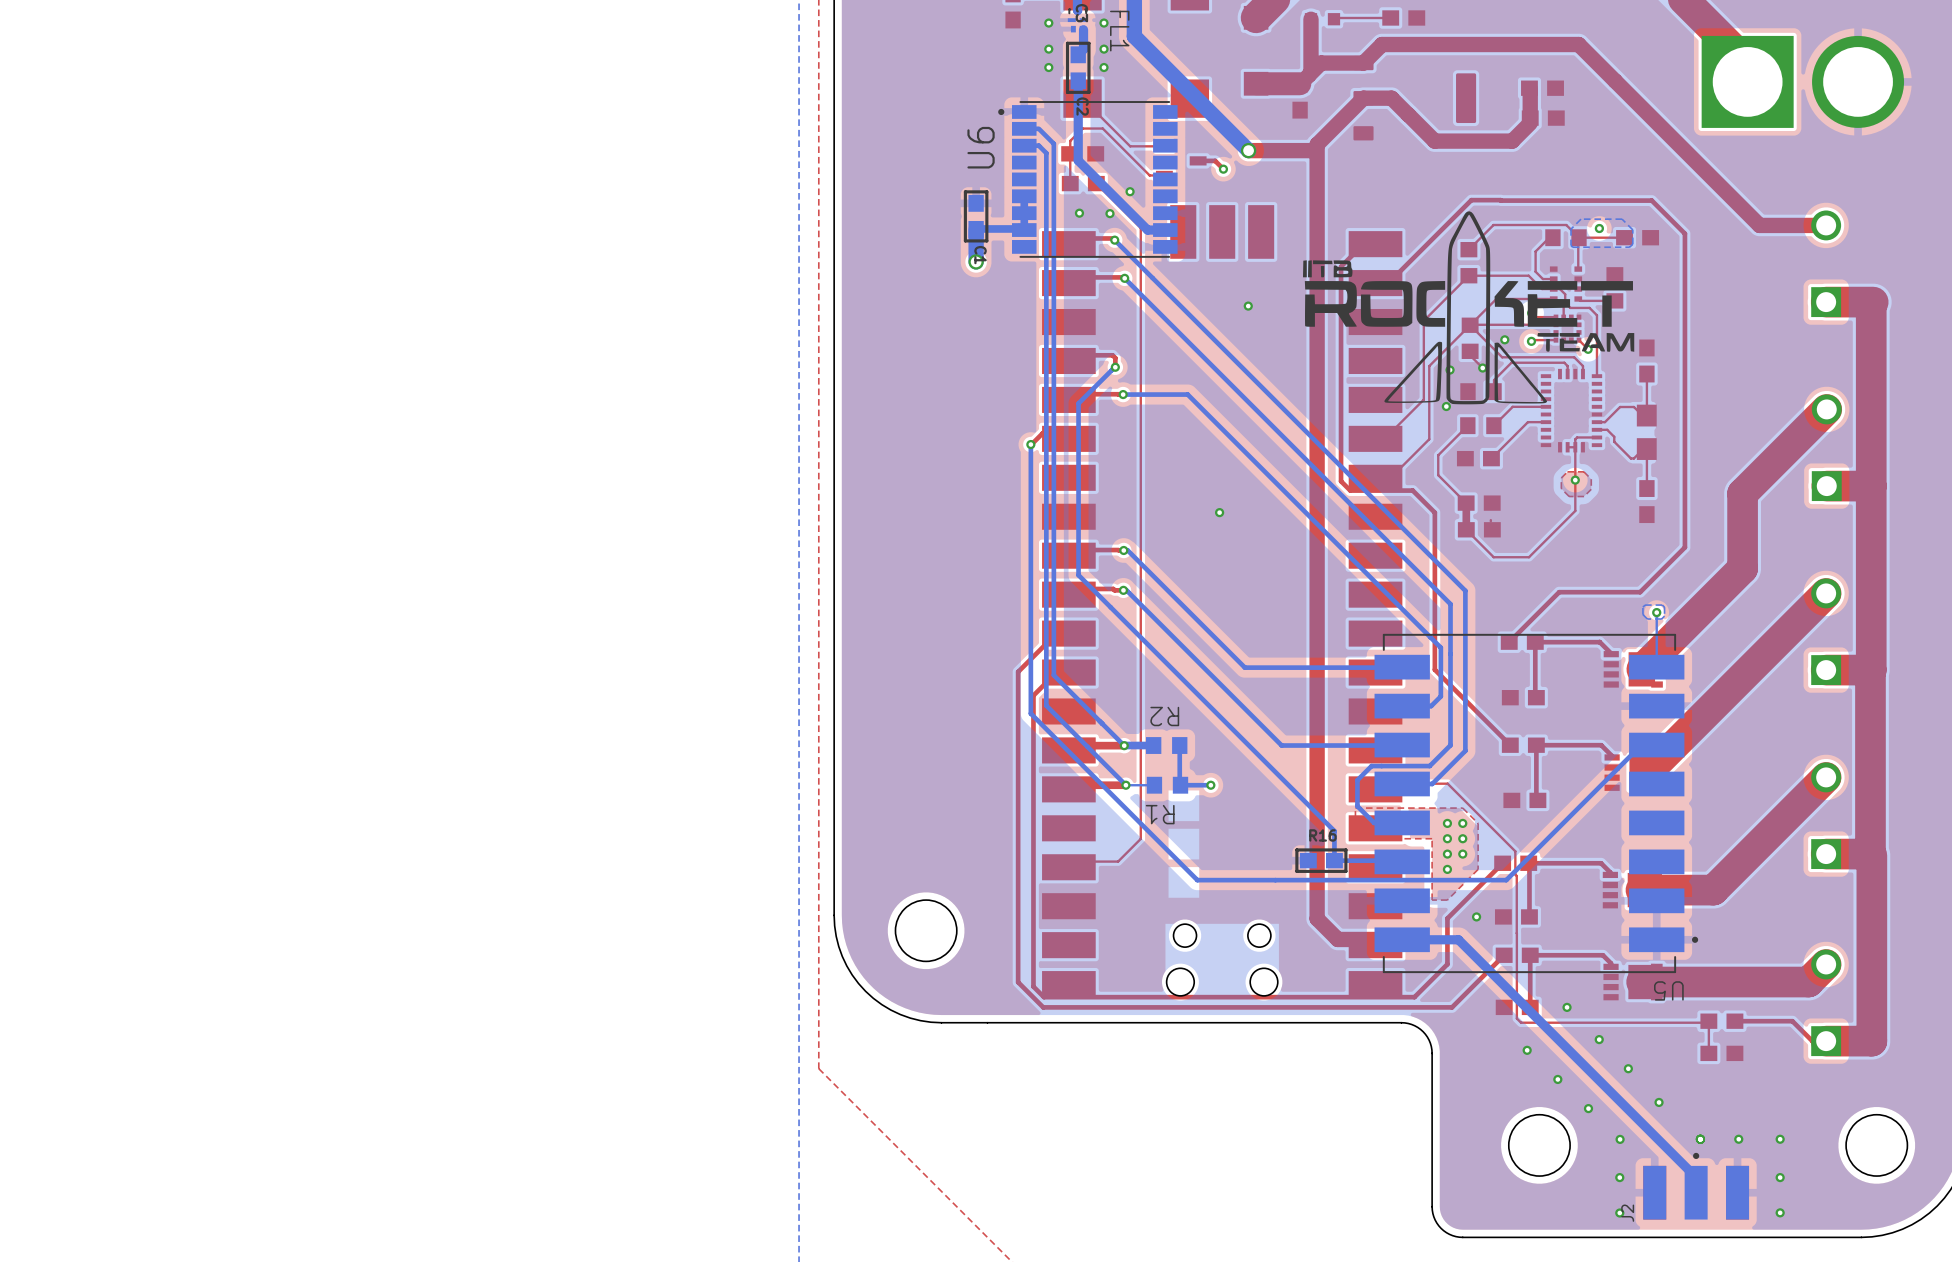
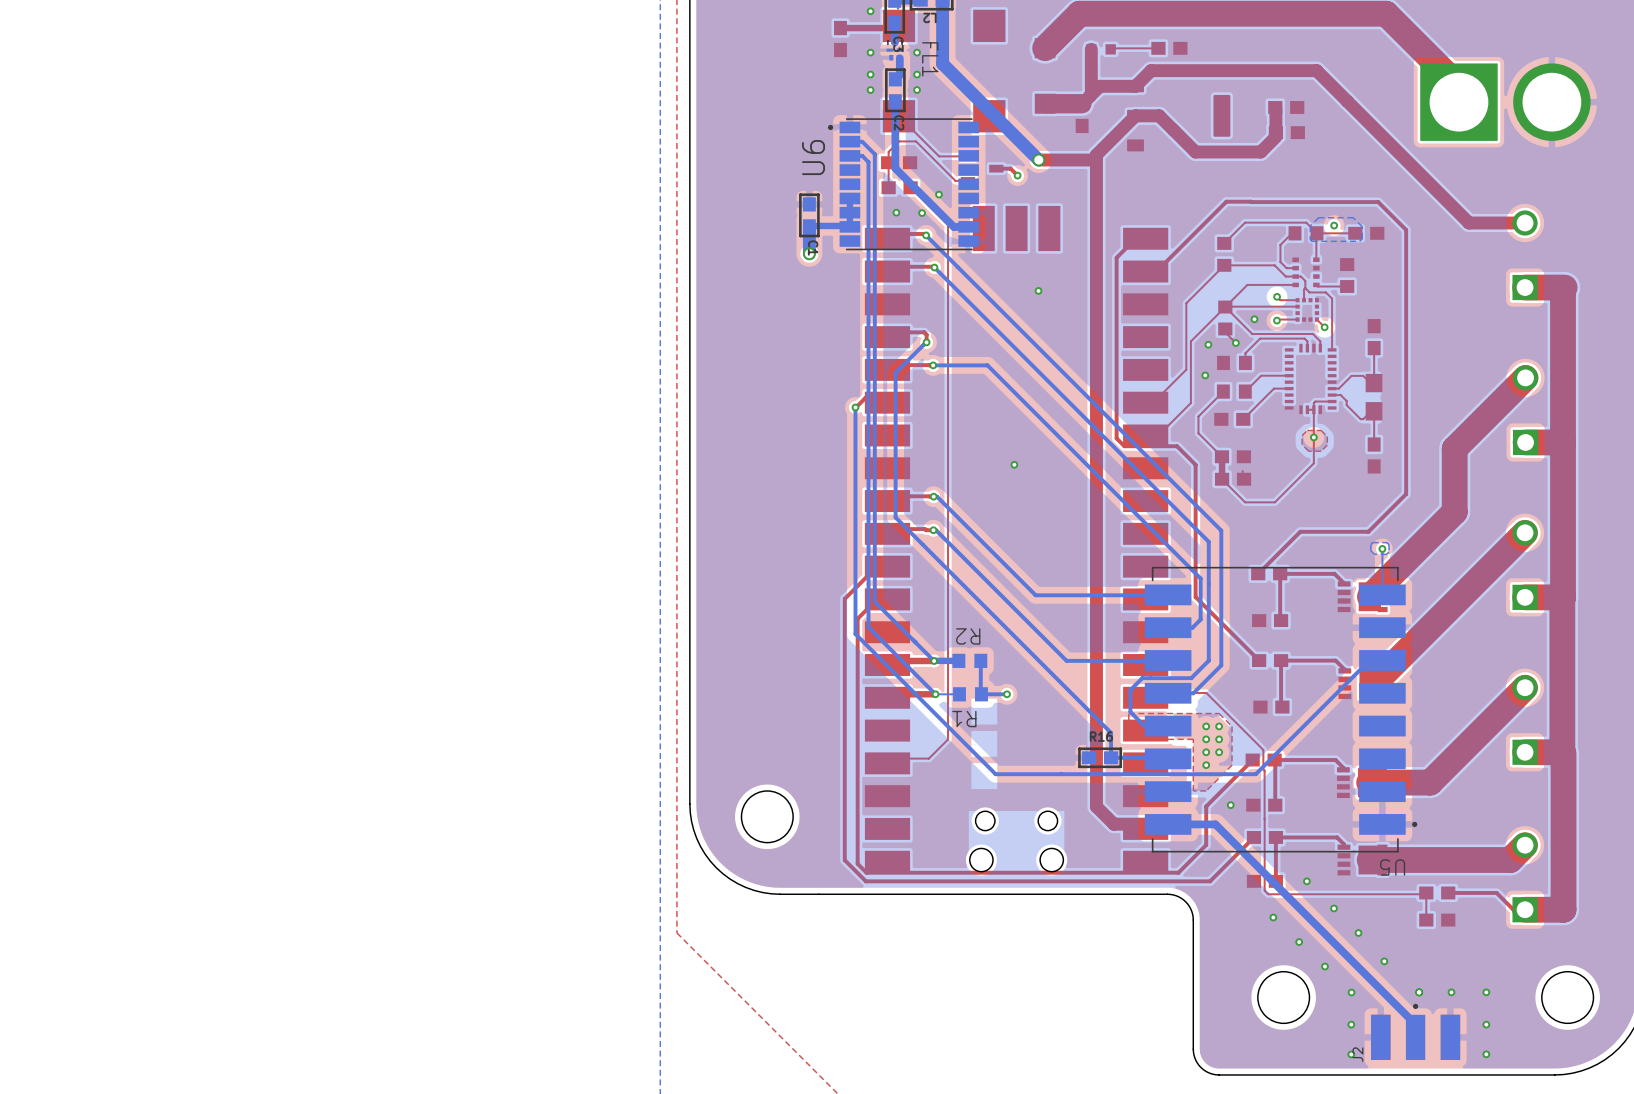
drawing: [1302, 211, 1635, 405] -> none

